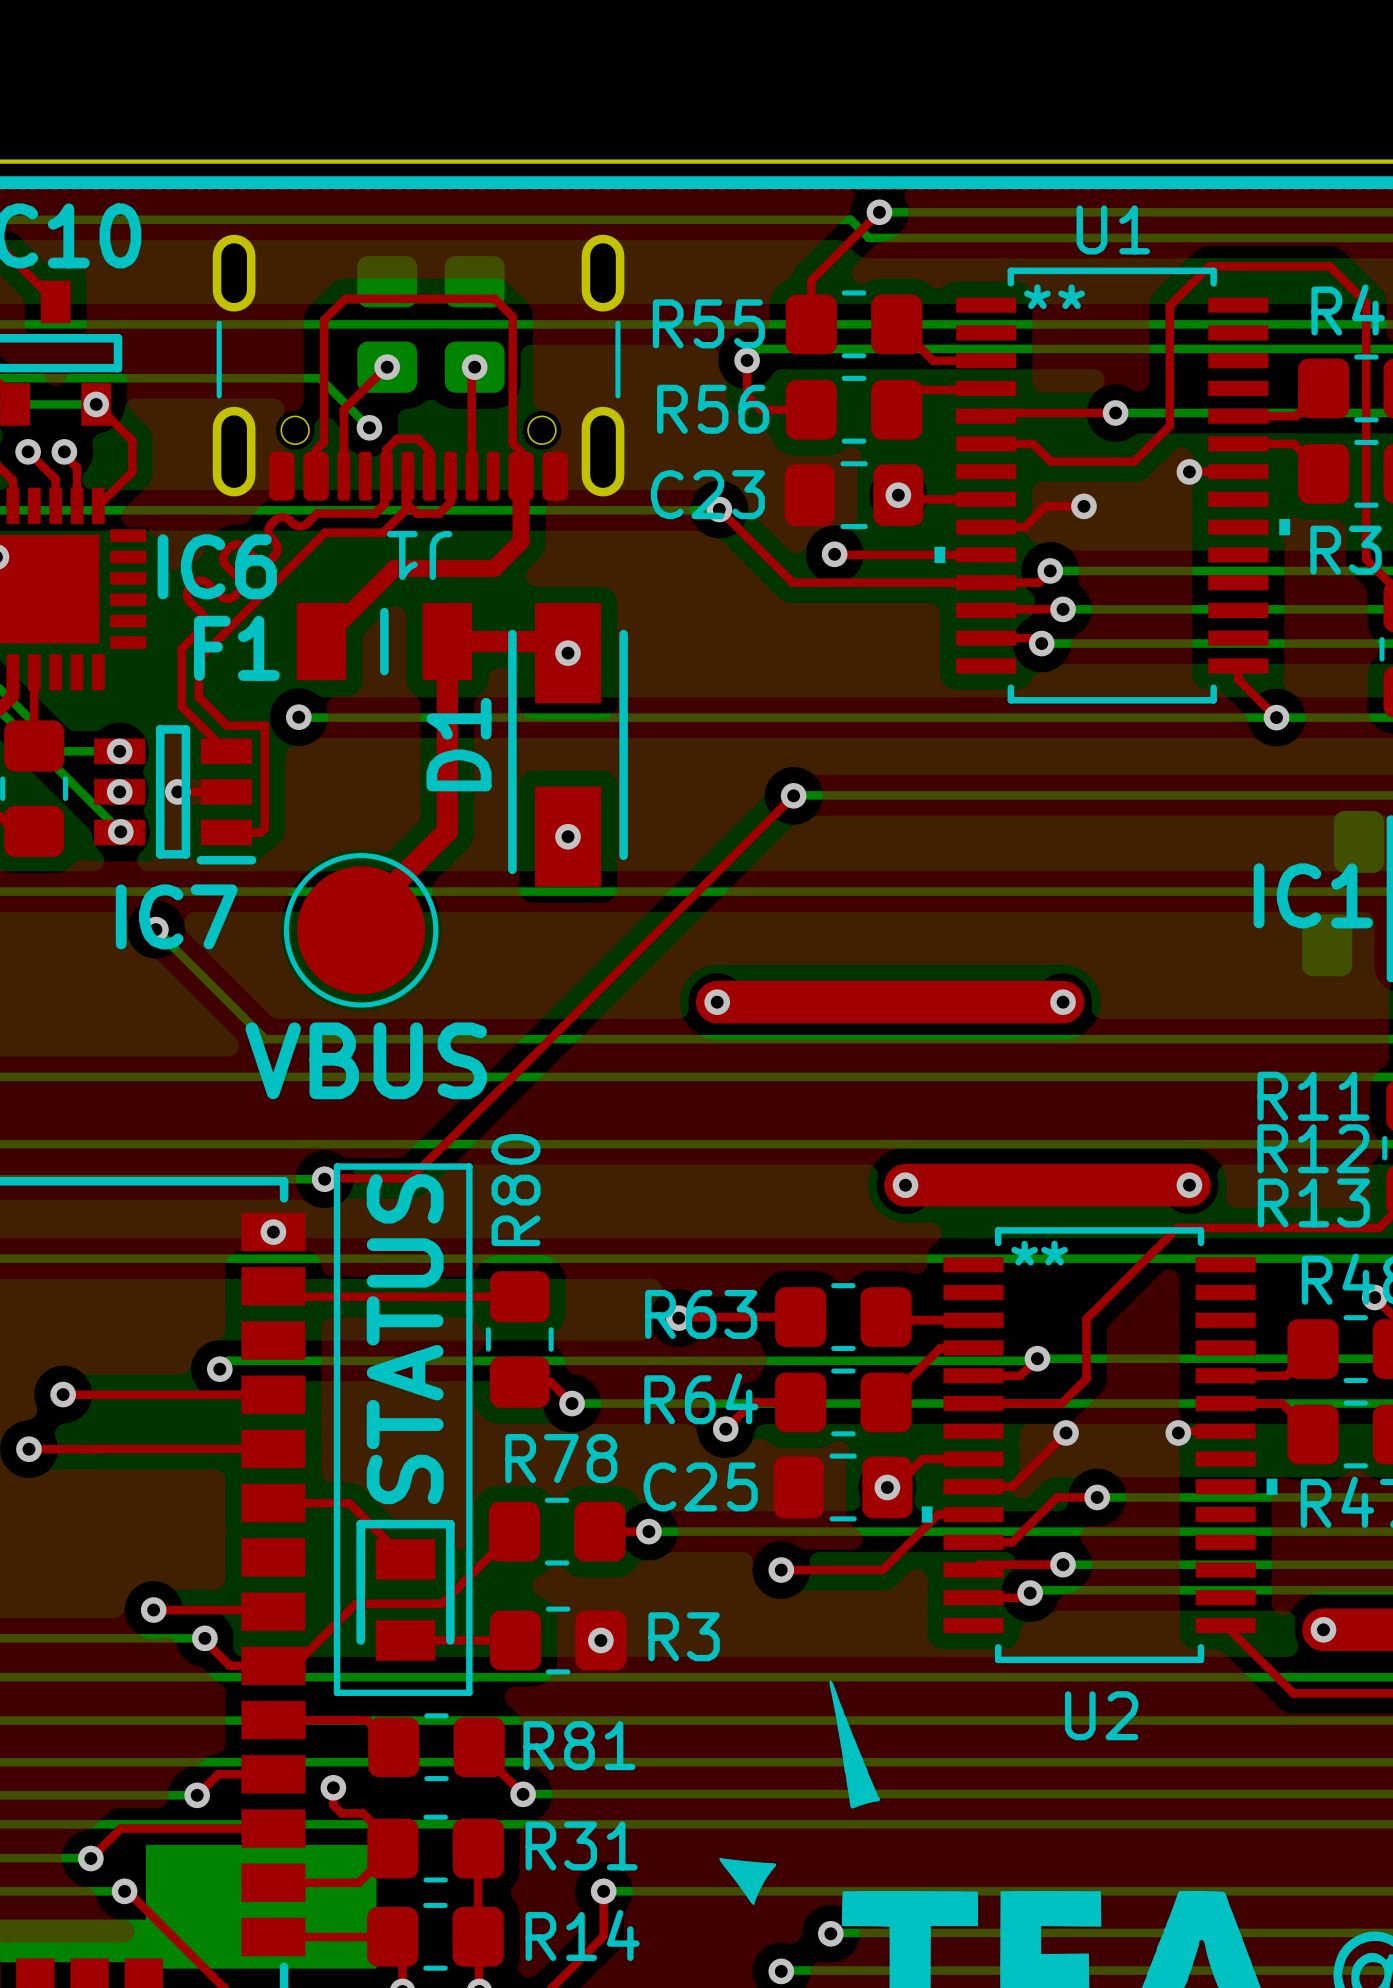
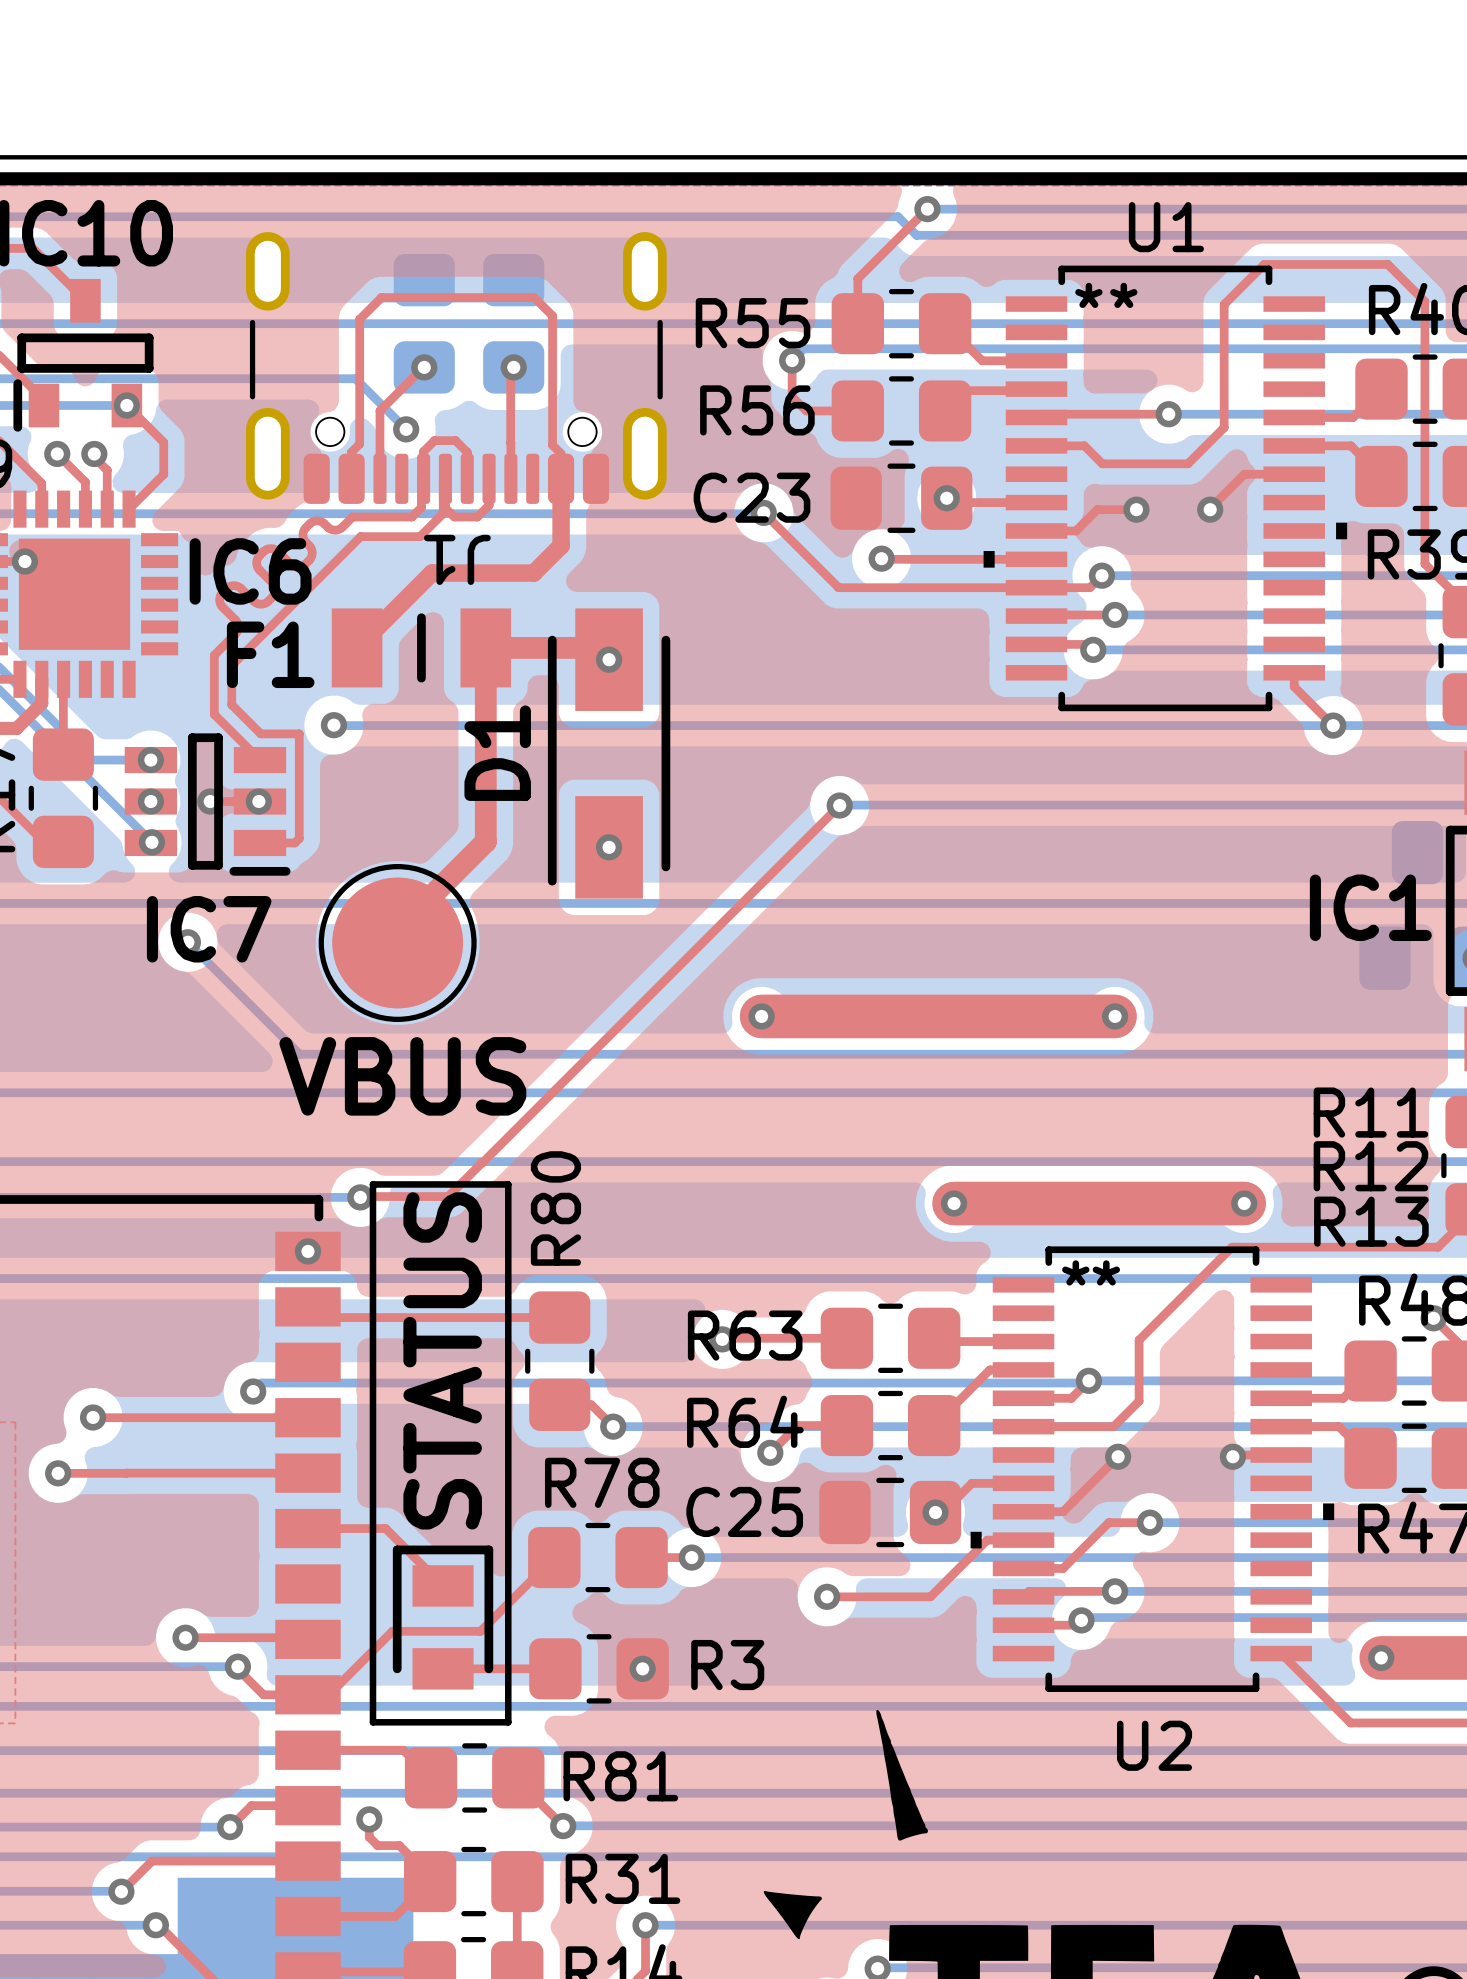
top track: none -> (1244, 474) (1210, 509)
via position: (1189, 471) -> (1210, 509)
via: none -> (258, 801)

